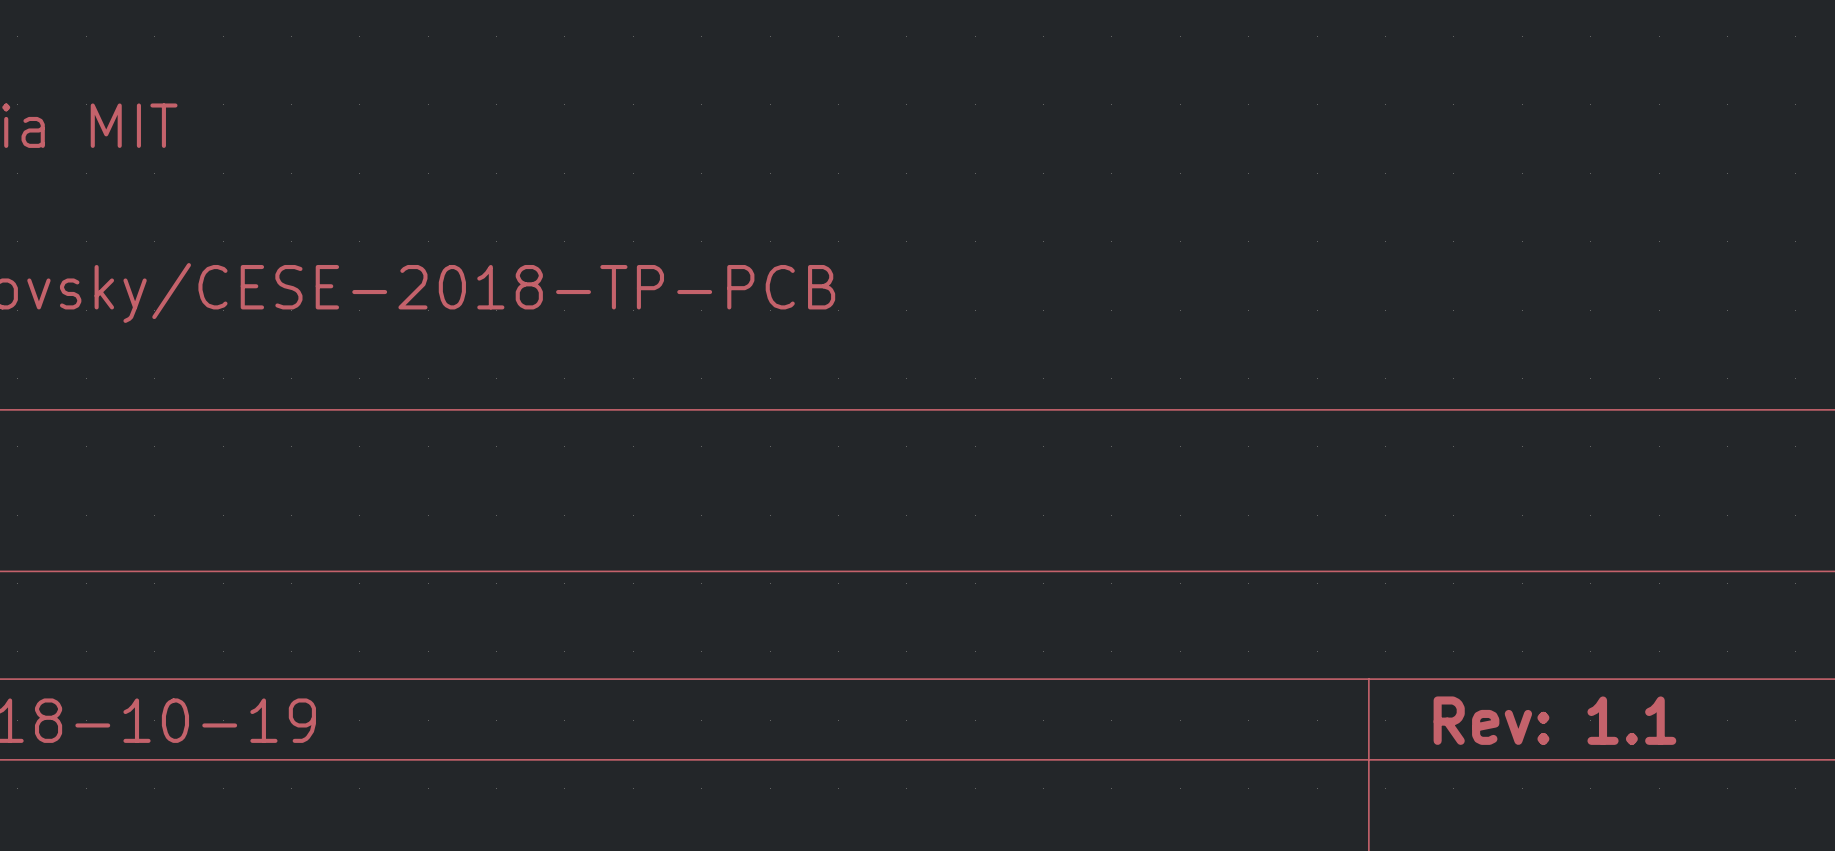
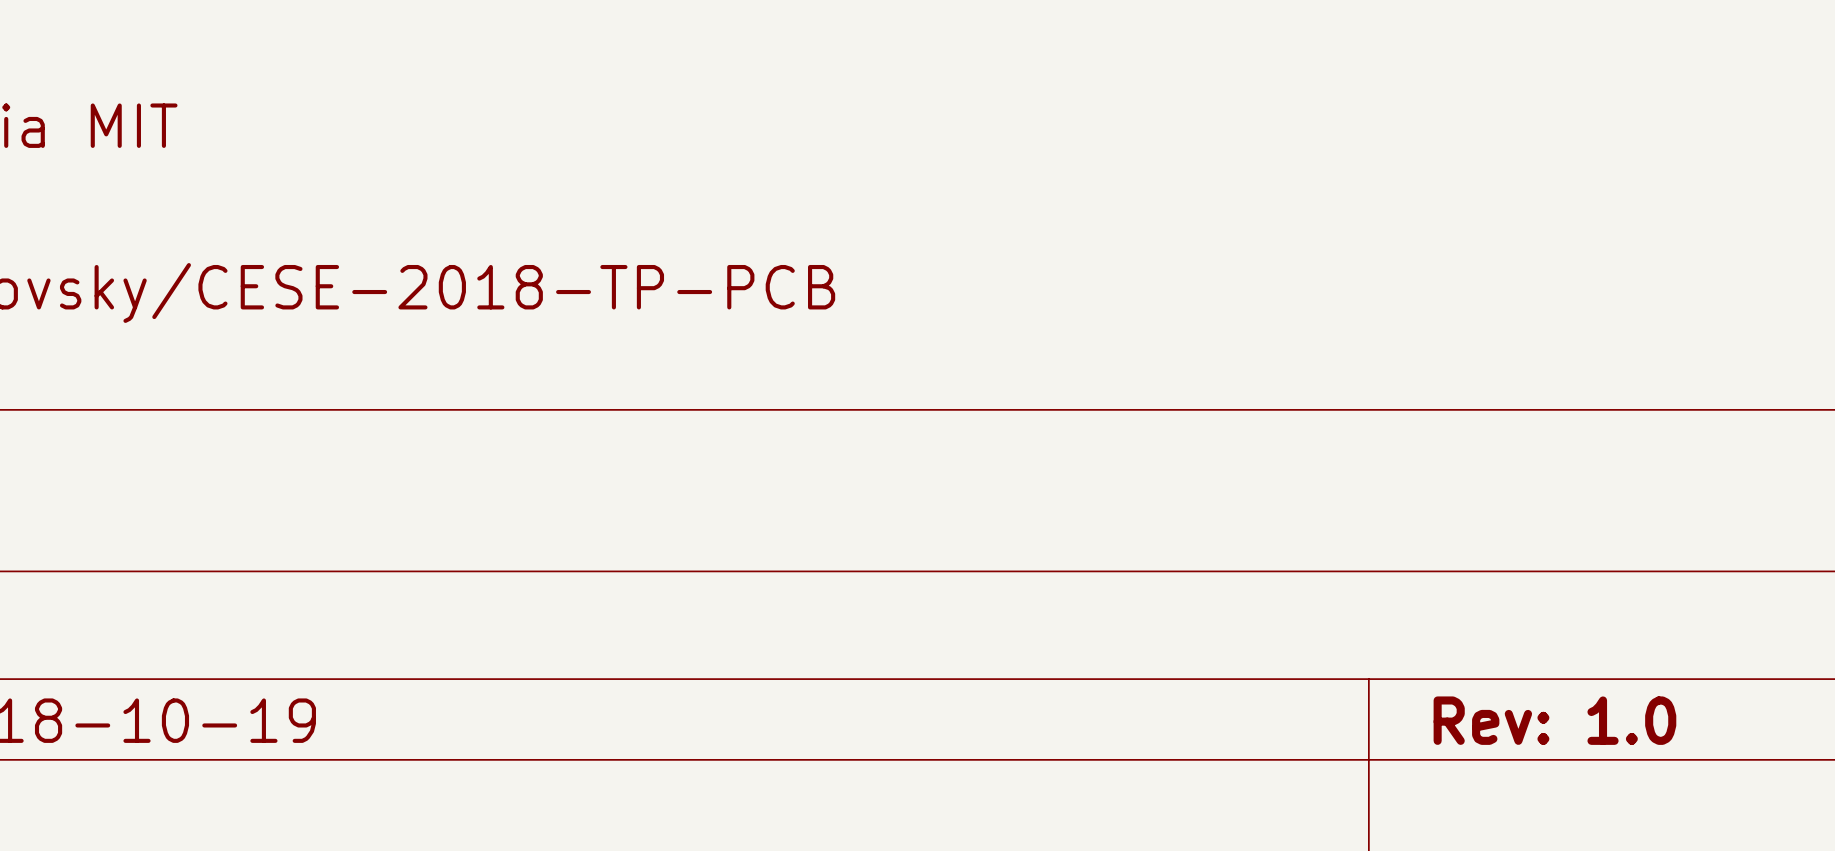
title block: Rev: 1.1 (1554, 720) -> Rev: 1.0 (1554, 720)

